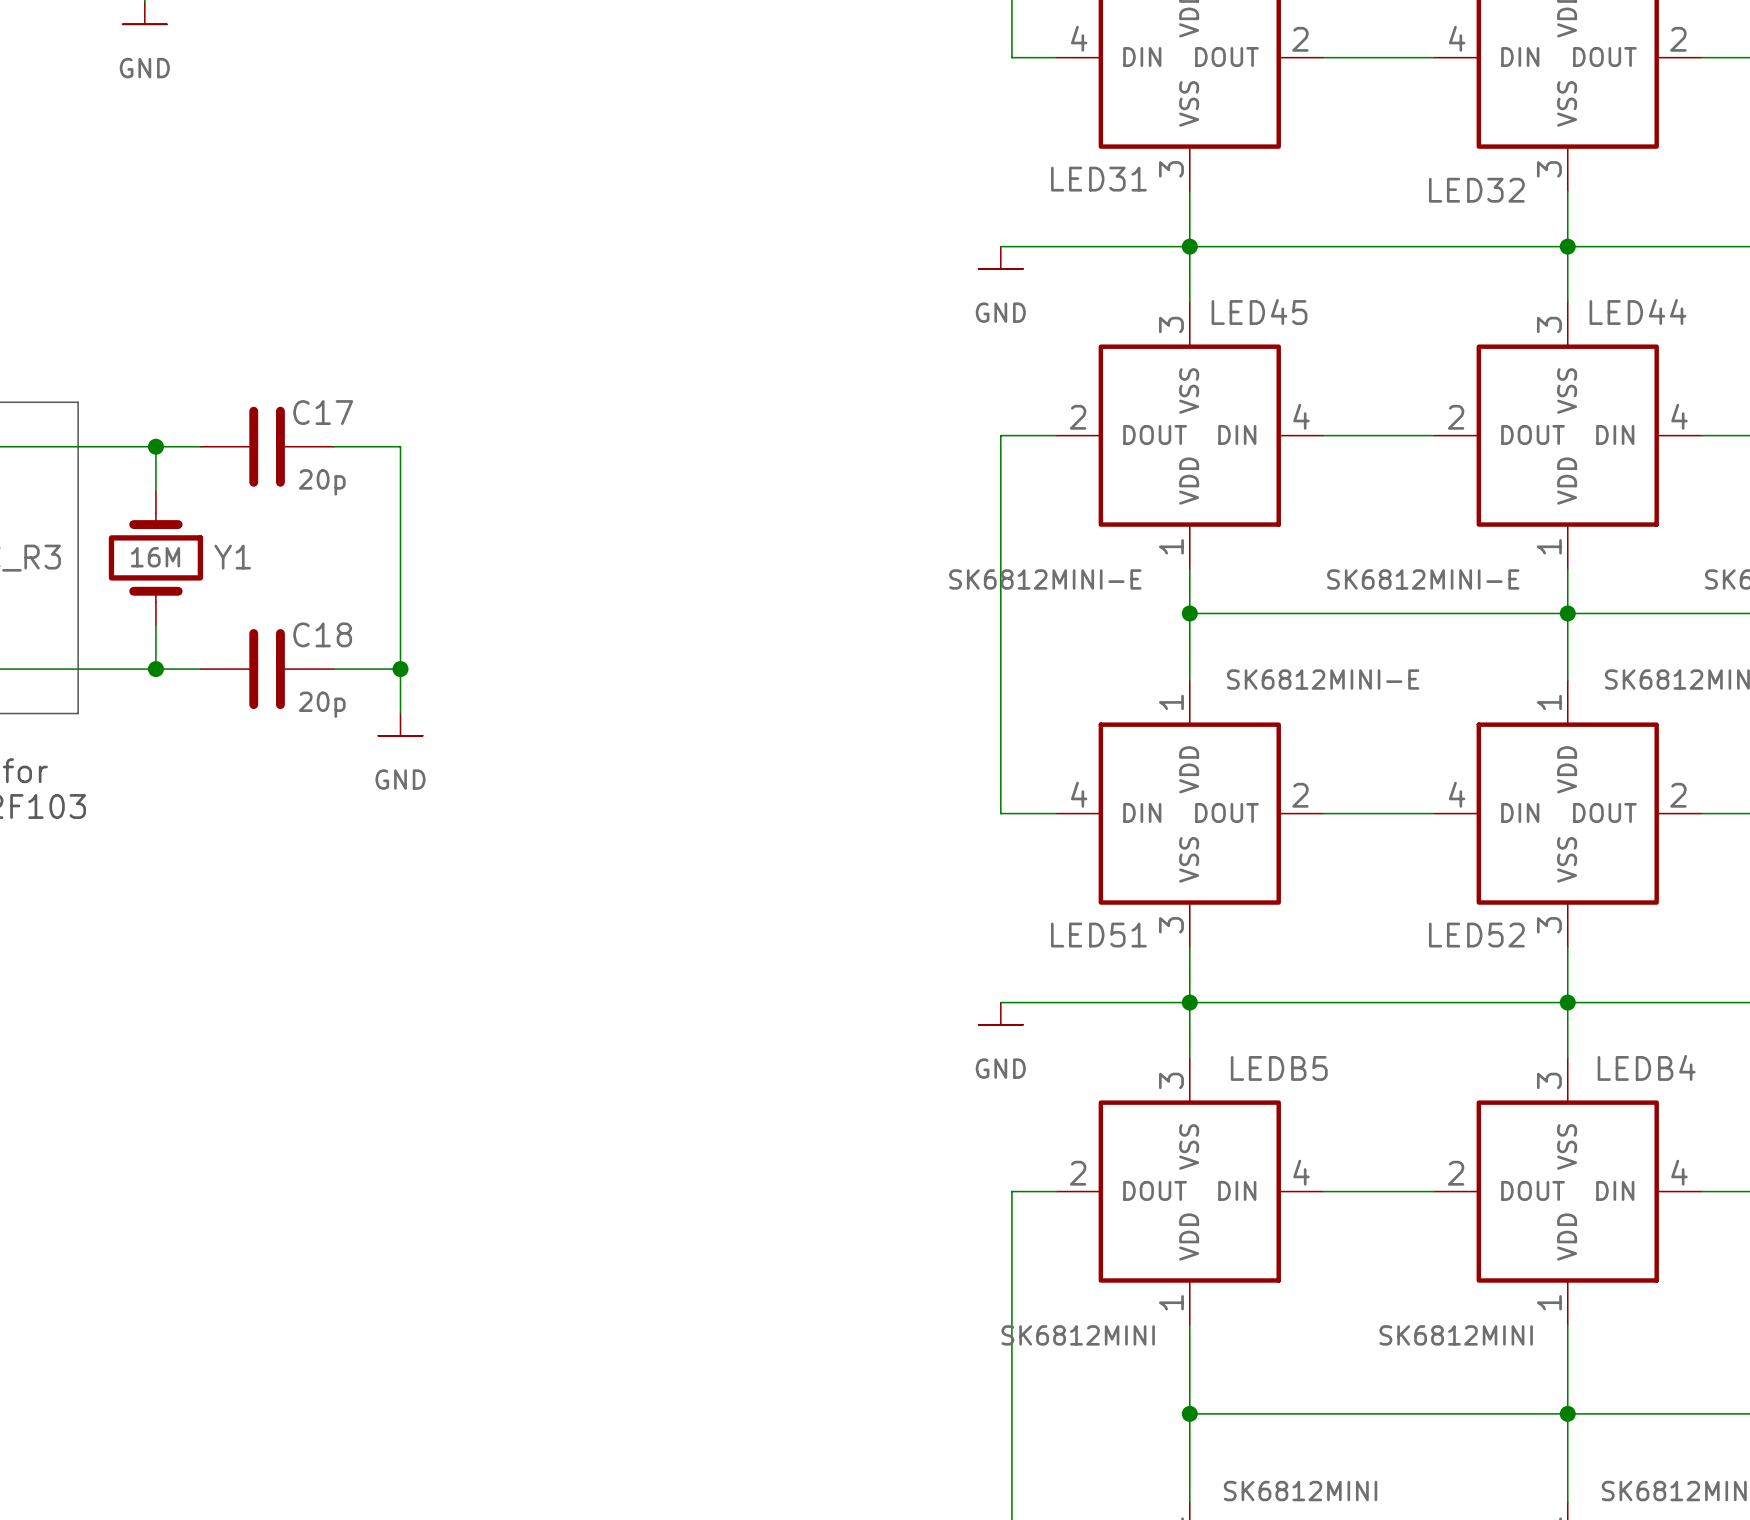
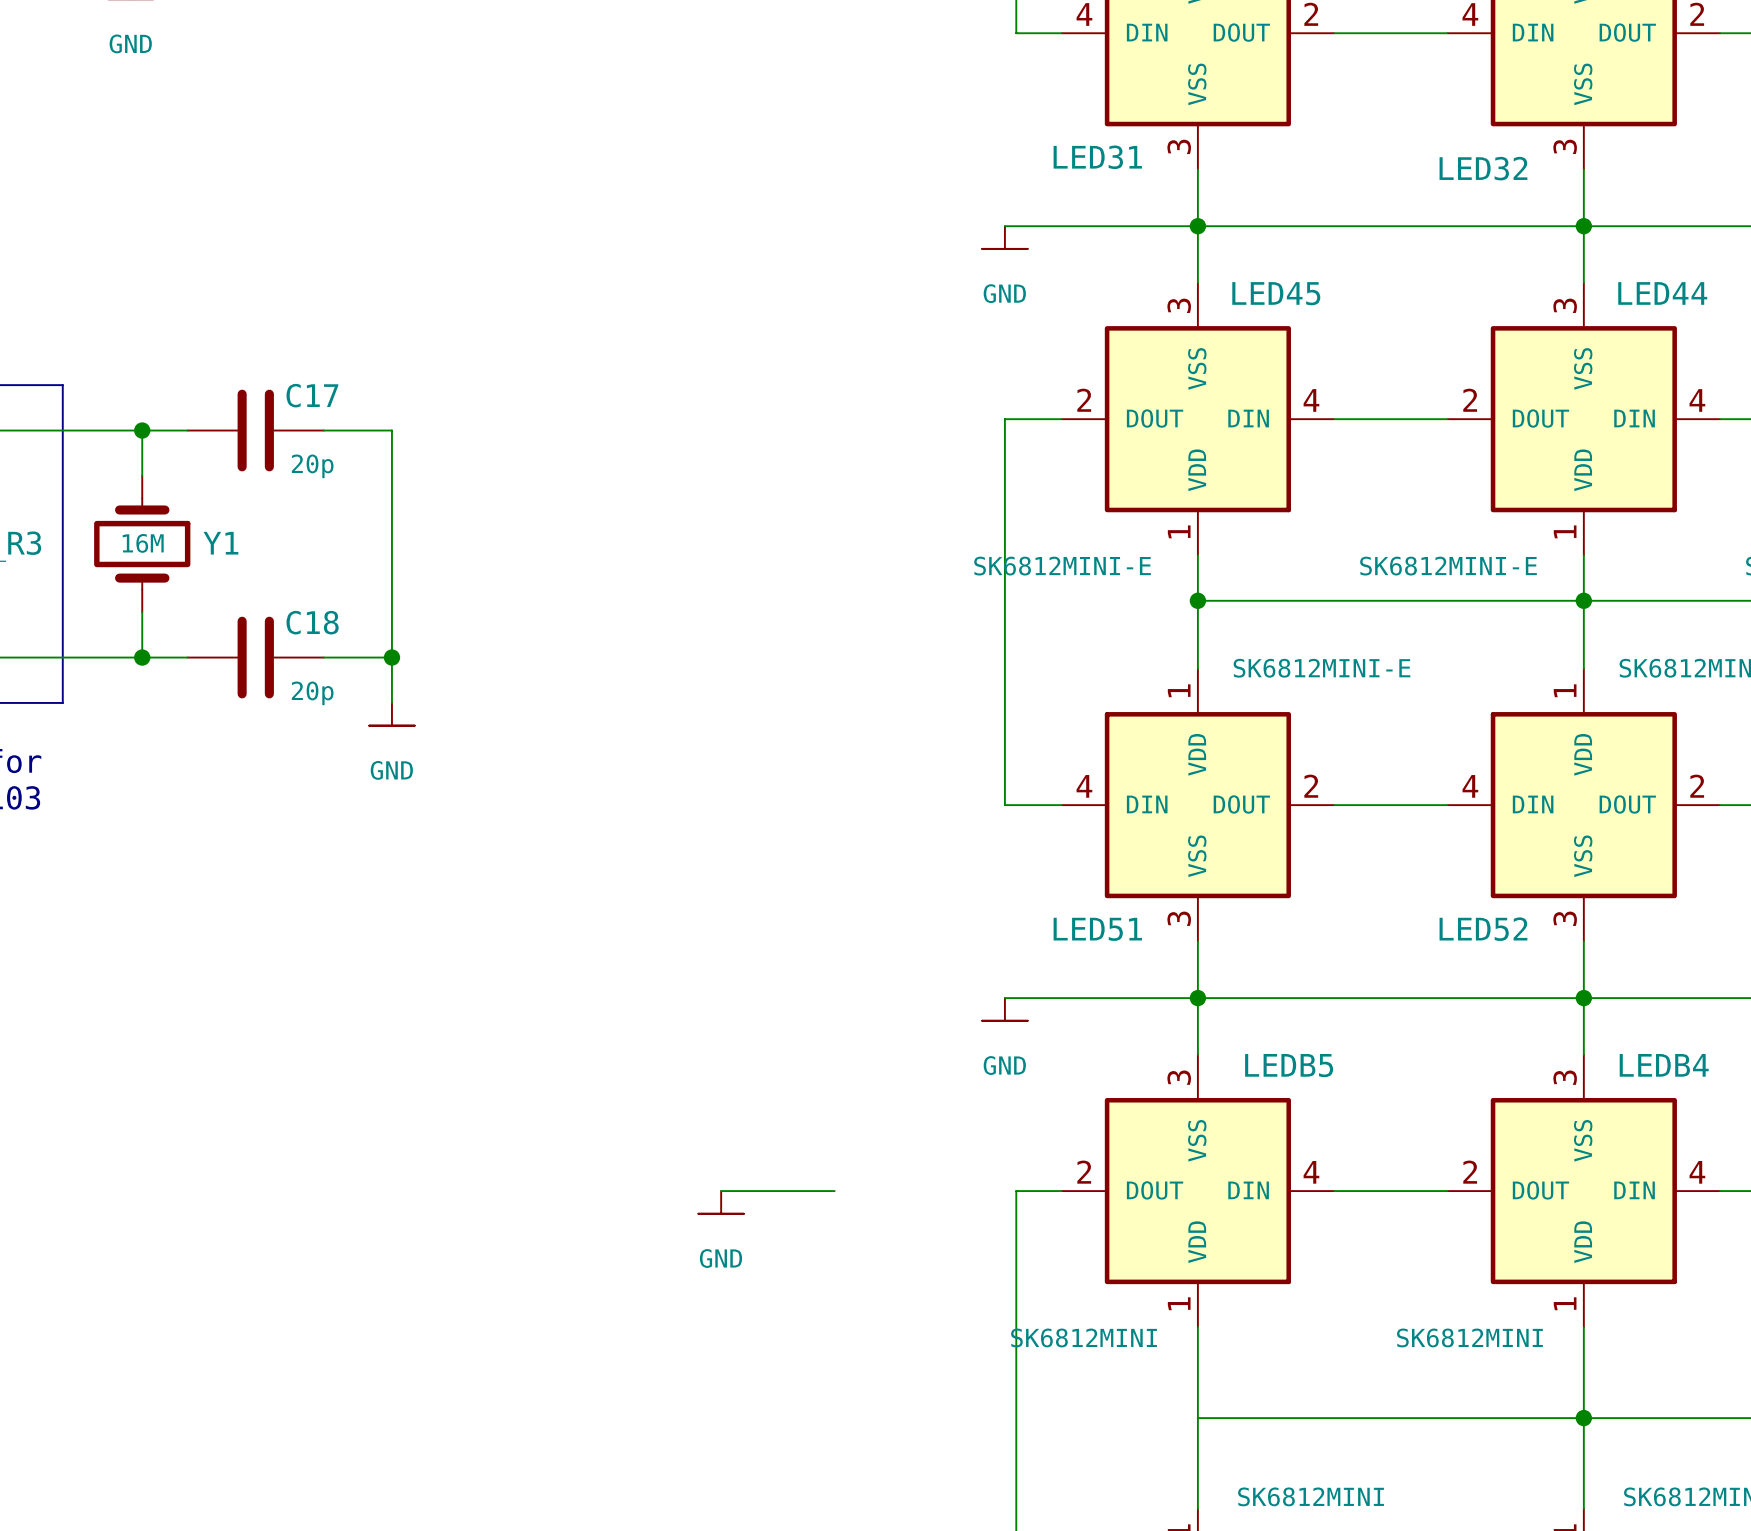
wire: none -> (721, 1191) (834, 1191)
power symbol: none -> GND (721, 1202)
junction: (1189, 1413) -> none

